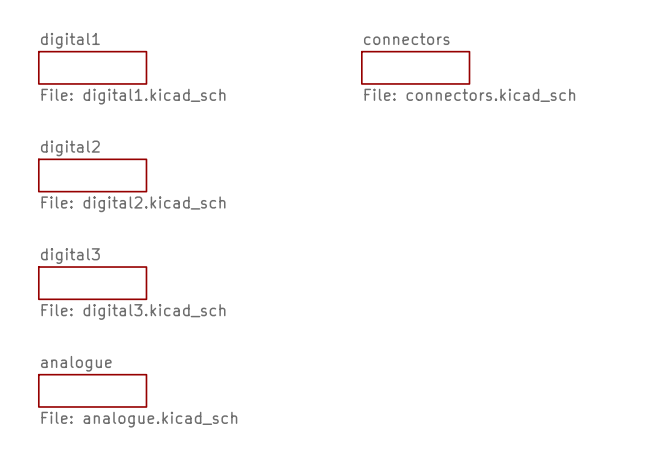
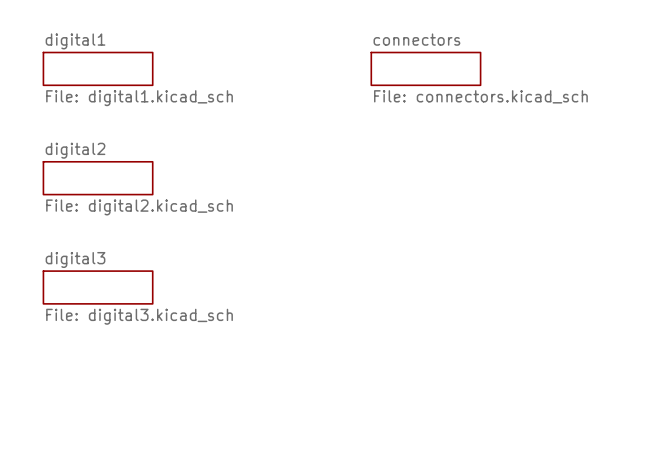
sheet analogue: File: analogue.kicad_sch (92, 390) -> none

